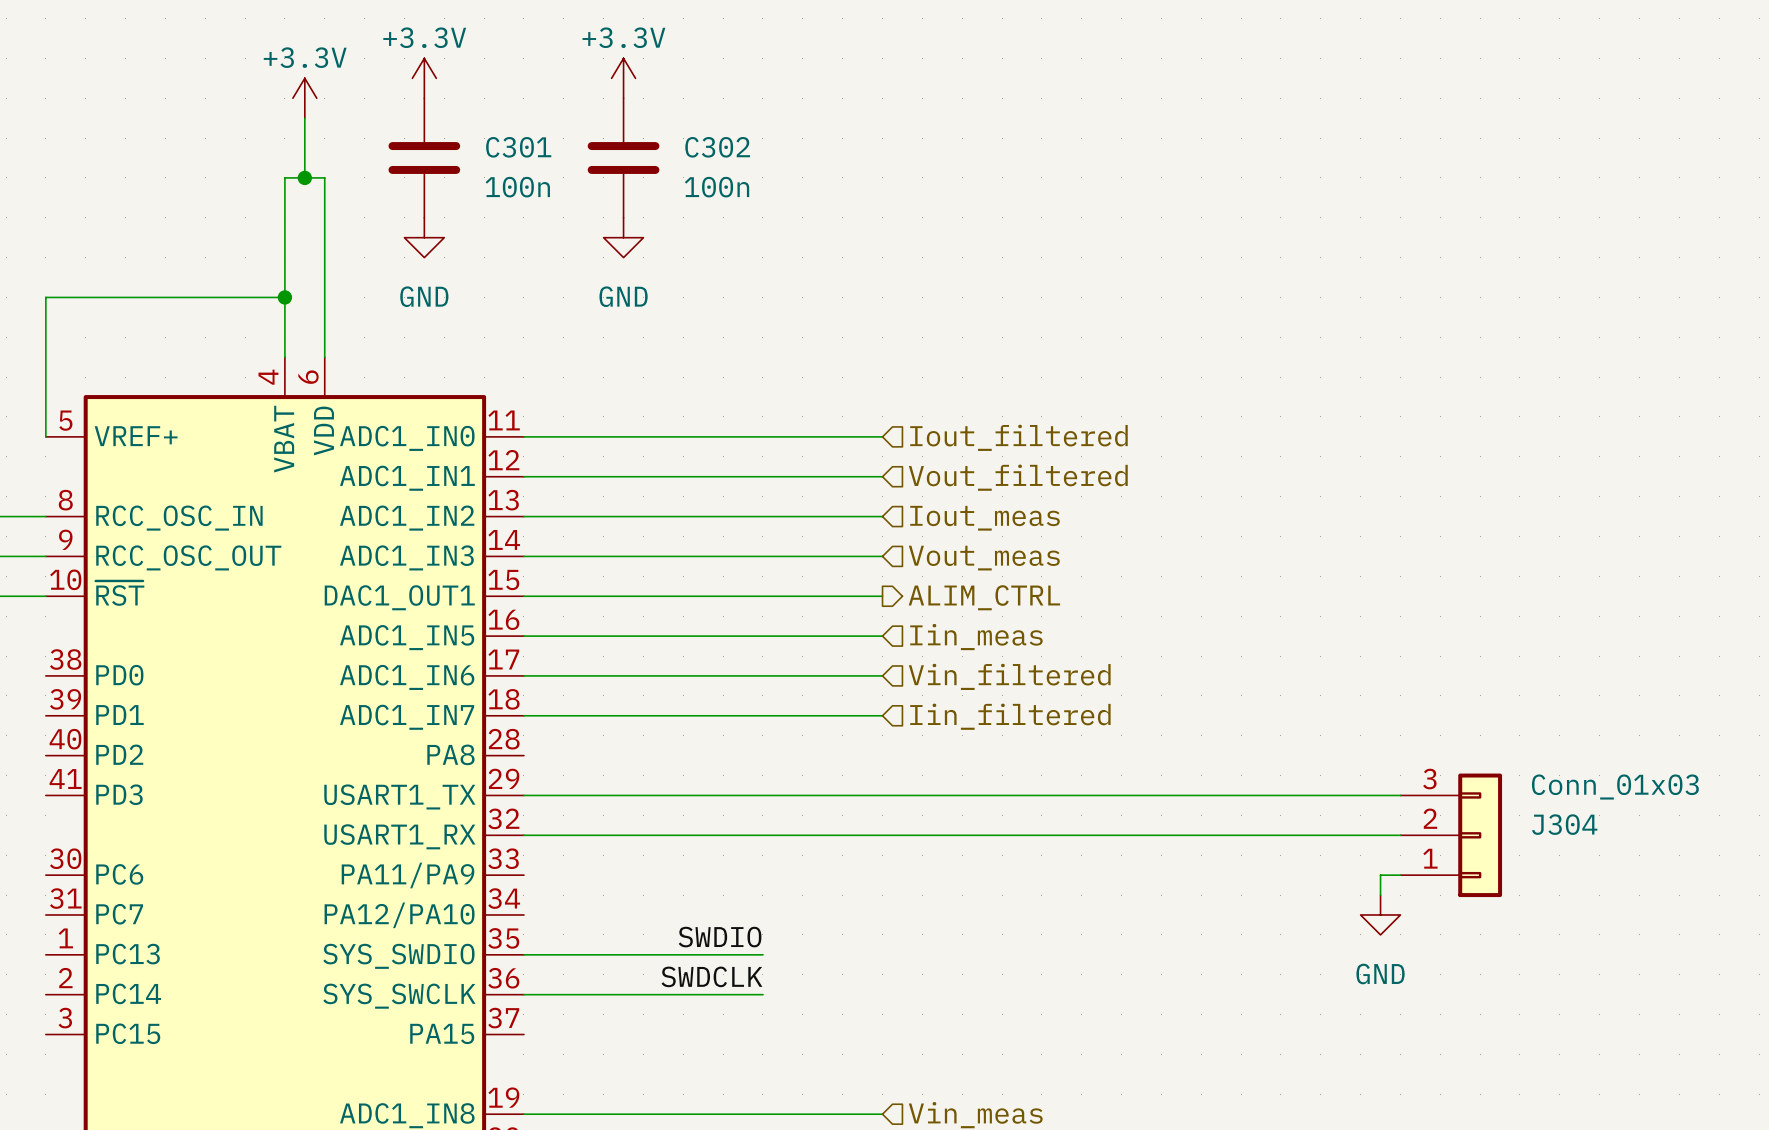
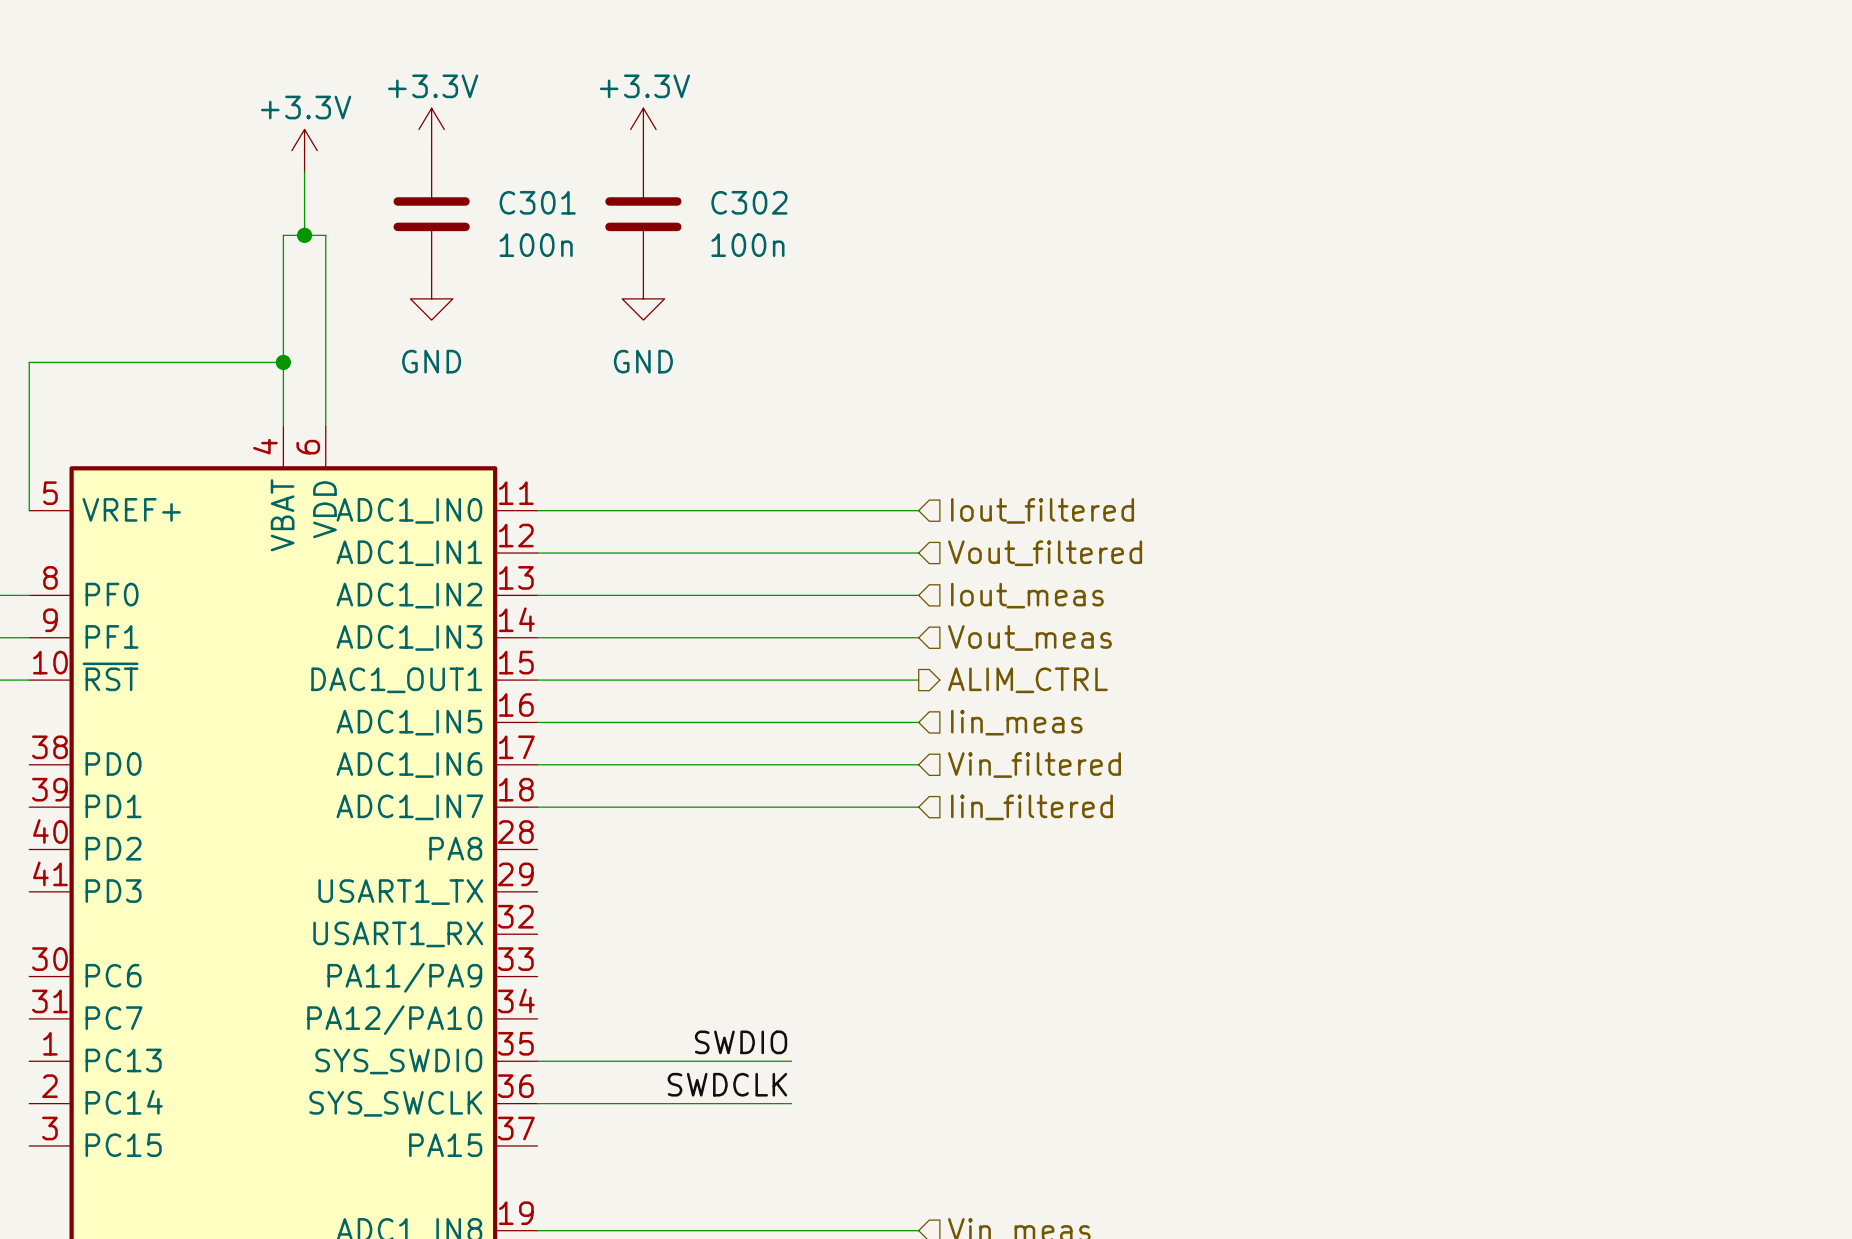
part pin name: RCC_OSC_IN (179, 518) -> PF0 (112, 594)
part pin name: RCC_OSC_OUT (188, 557) -> PF1 (112, 636)
wire: (523, 795) (1400, 795) -> none
wire: (523, 835) (1400, 835) -> none
J304: Conn_01x03 (1451, 835) -> none
wire: (1400, 875) (1380, 875) (1380, 895) -> none
power symbol: GND (1380, 914) -> none

